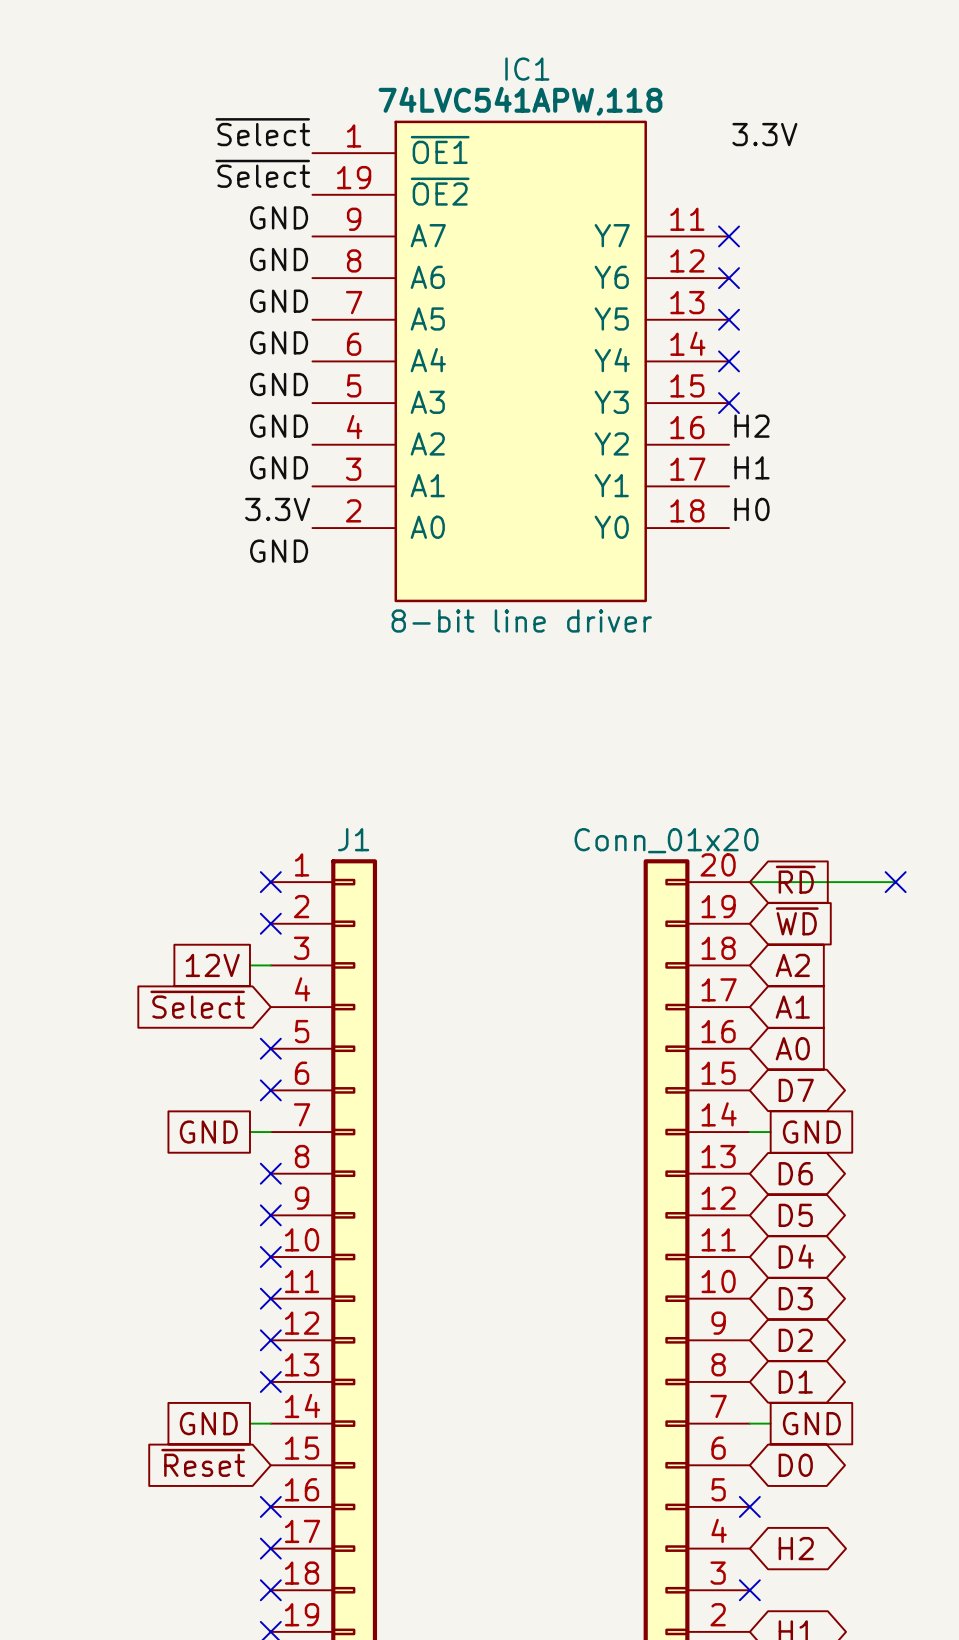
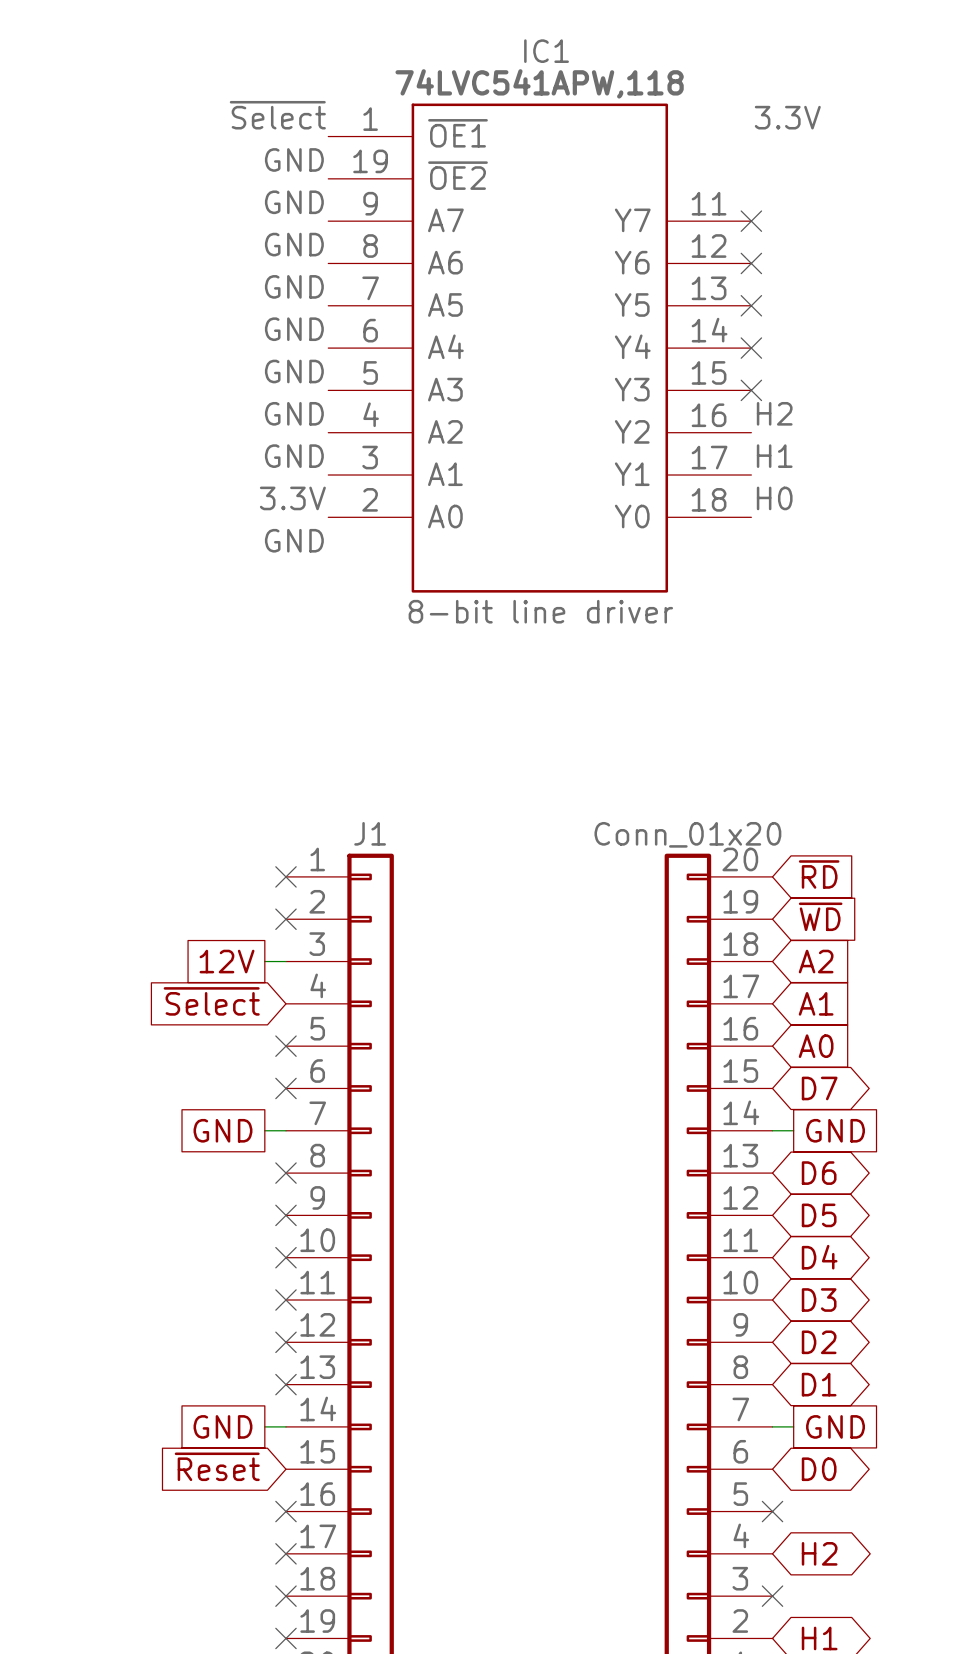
label: ~{Select} (262, 173) -> GND (294, 159)
wire: (749, 882) (895, 882) -> none
no-connect mark: (895, 882) -> none

